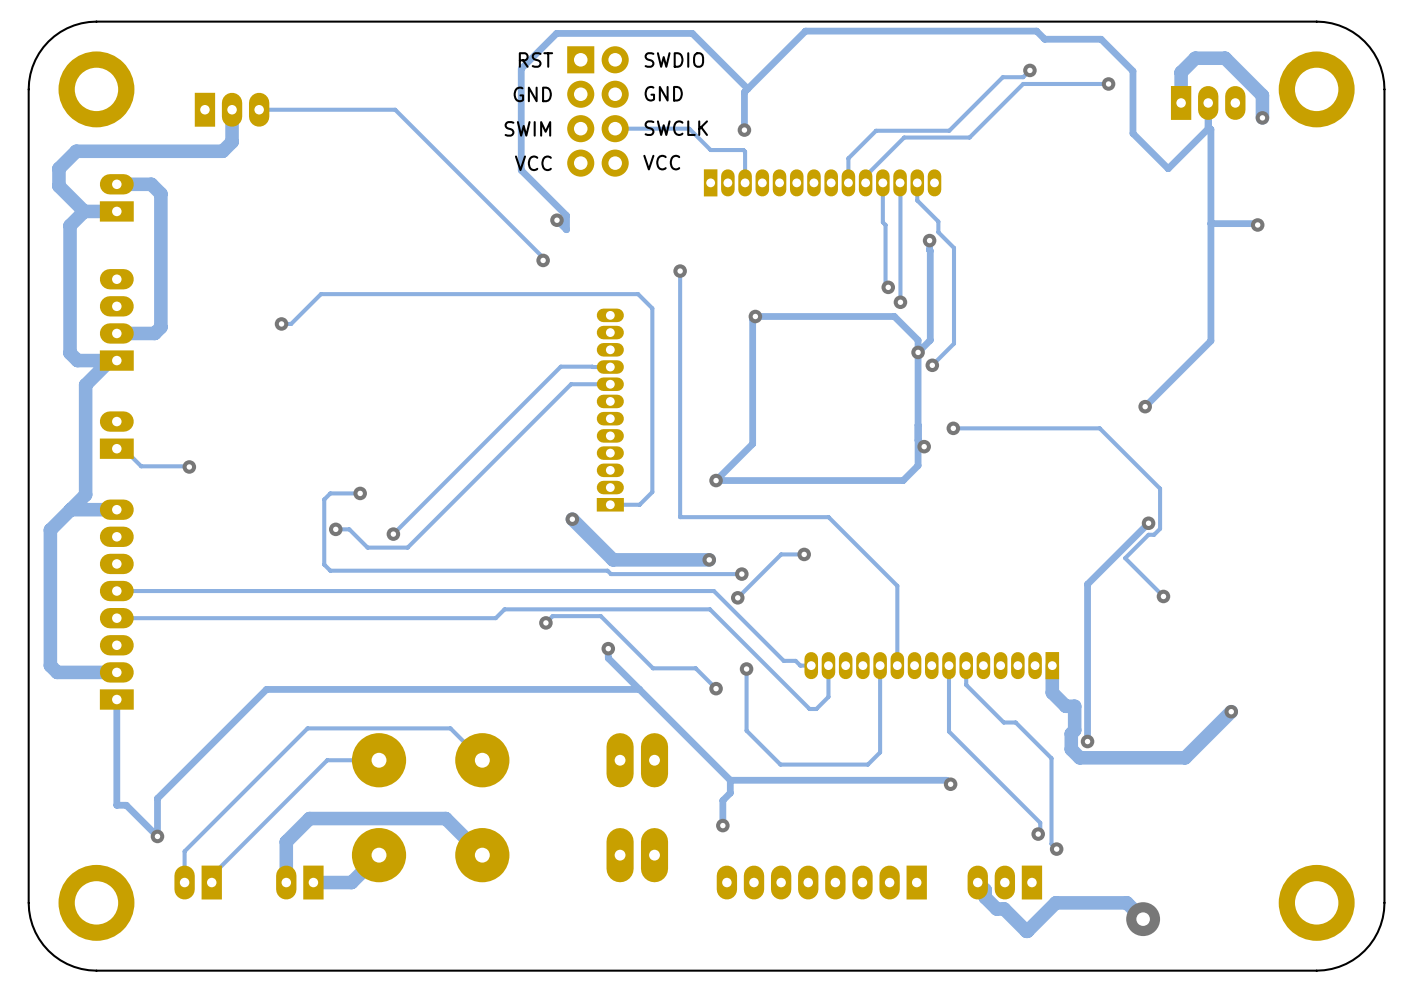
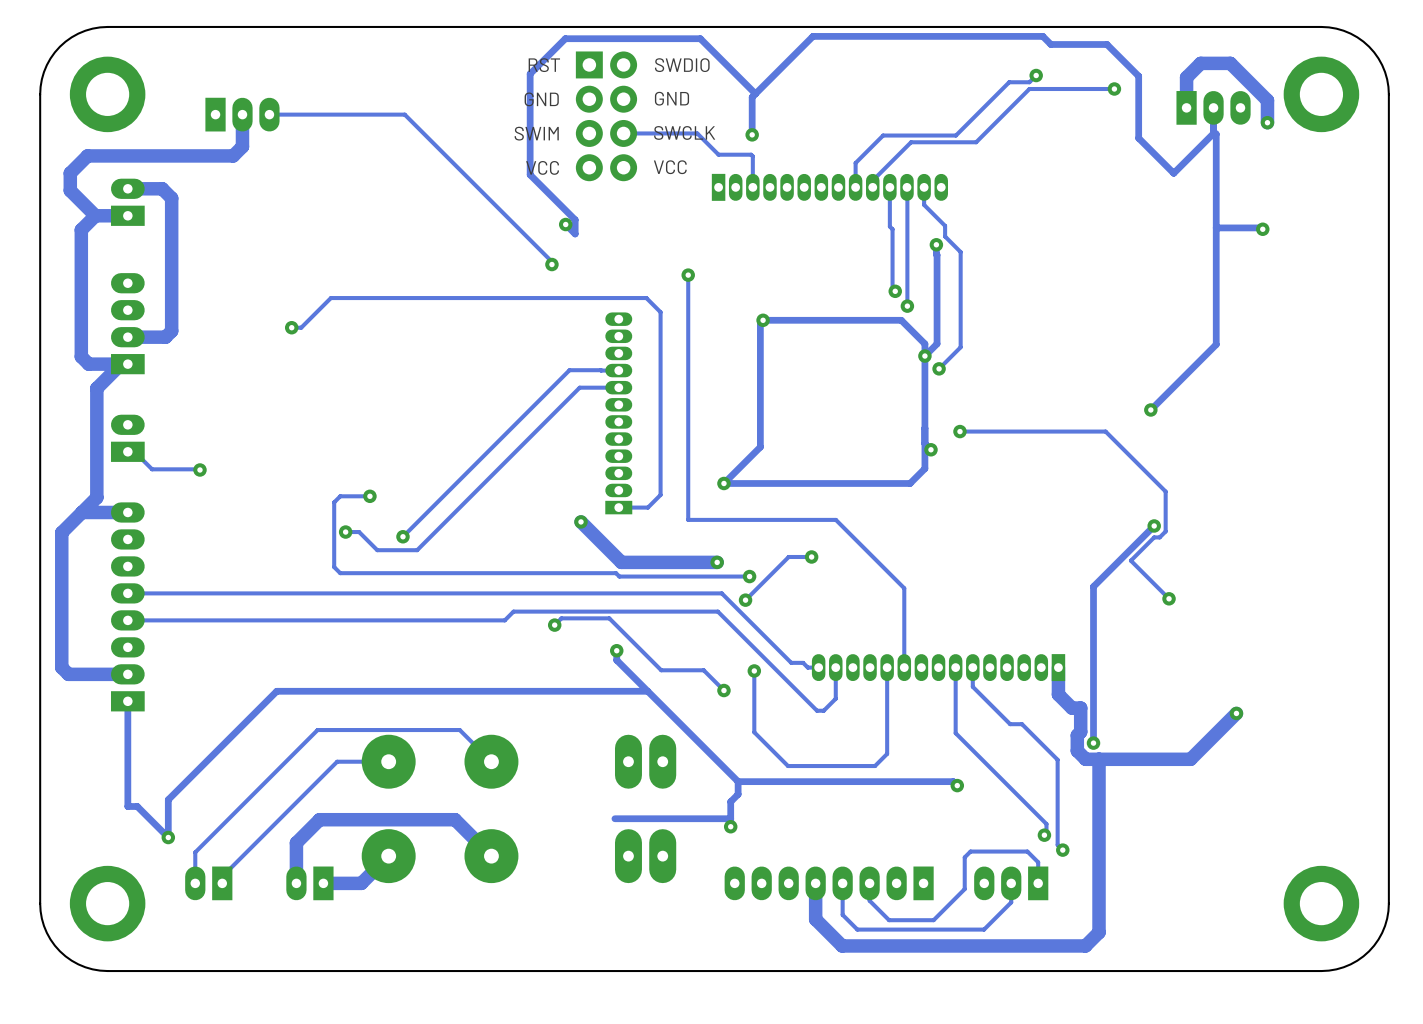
track: none -> (1099, 759) (1099, 932) (1085, 945) (842, 945) (815, 919) (815, 883)
track: none -> (730, 818) (614, 818)
track: (977, 882) (985, 889) (985, 897) (996, 908) (1004, 908) (1026, 931) (1055, 902) (1126, 902) (1143, 919) -> none
track: none -> (1011, 883) (1011, 902) (984, 929) (857, 929) (842, 914) (842, 883)
track: none -> (1038, 883) (1038, 862) (1027, 851) (970, 851) (964, 857) (964, 889) (933, 920) (889, 920) (869, 900) (869, 883)
via: (1143, 919) -> none

